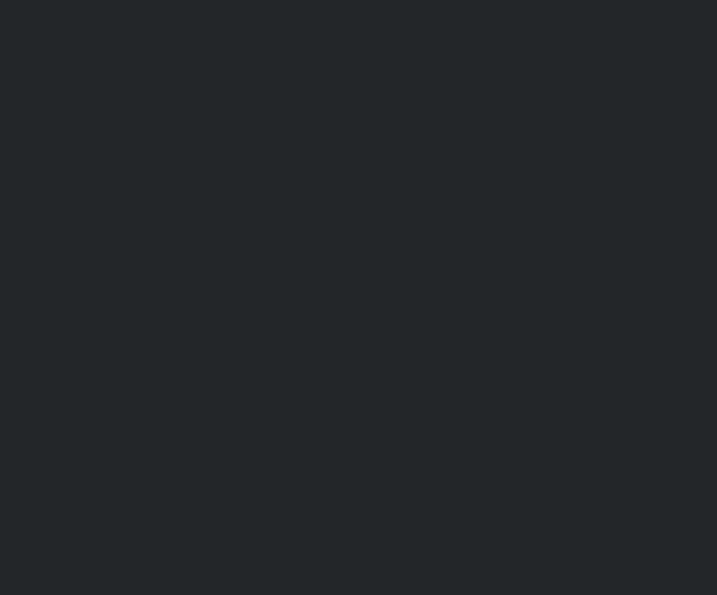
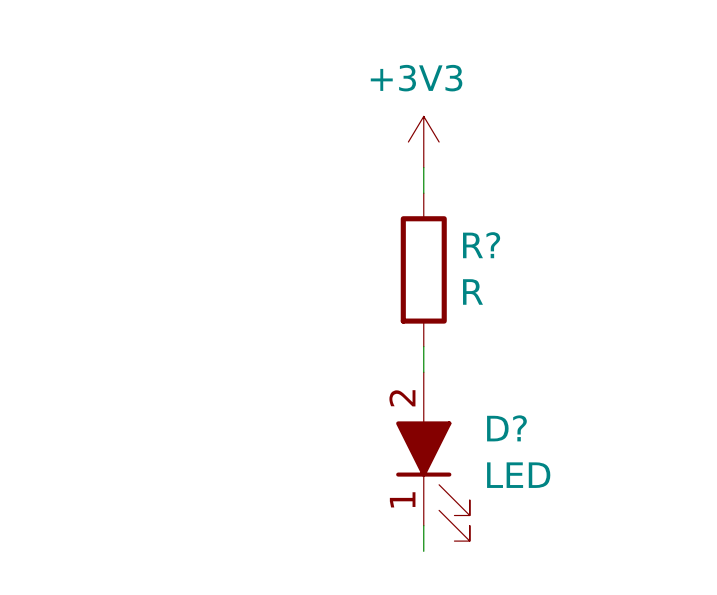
power symbol: none -> +3V3 (423, 142)
wire: none -> (423, 167) (423, 193)
R?: none -> R (423, 269)
wire: none -> (423, 346) (423, 372)
D?: none -> LED (432, 456)
wire: none -> (423, 525) (423, 551)

